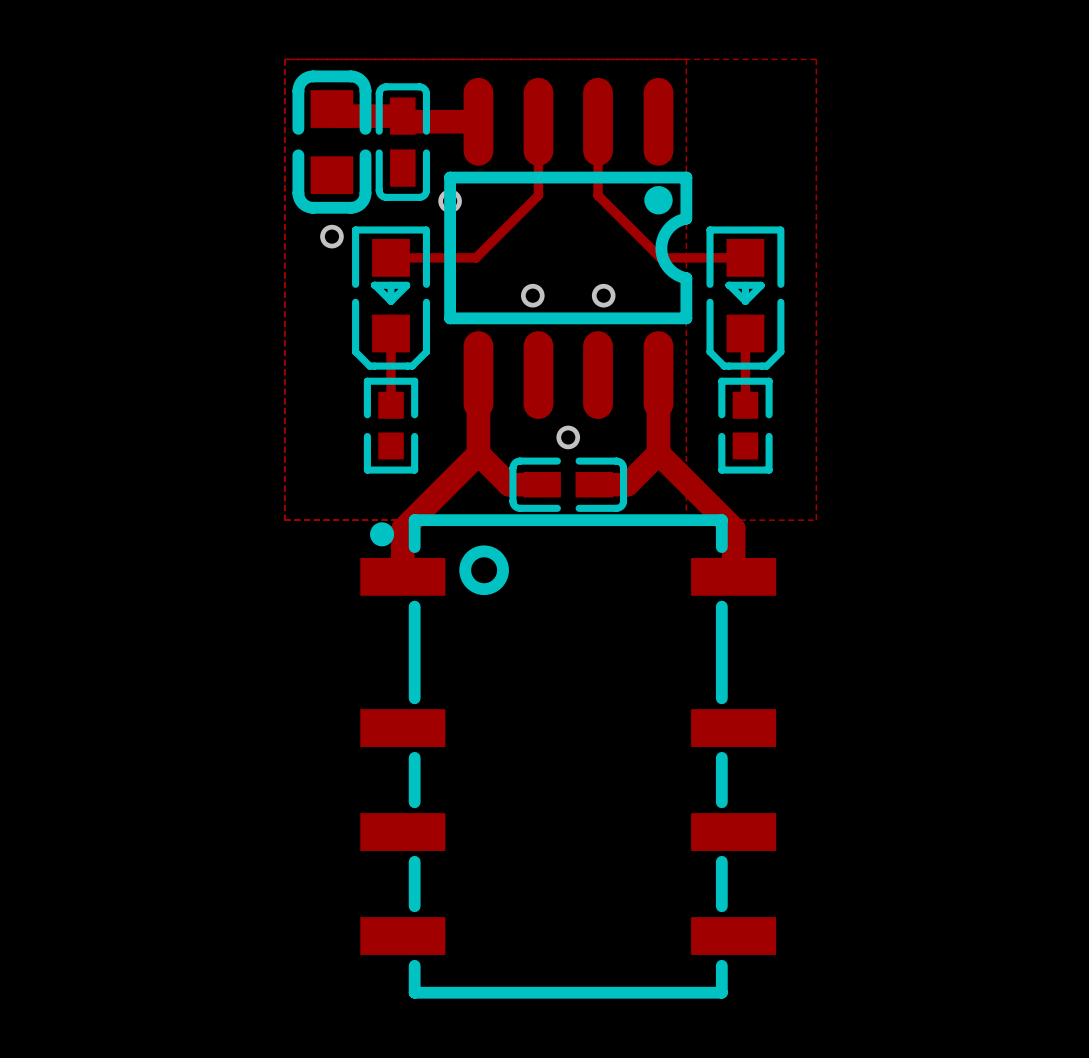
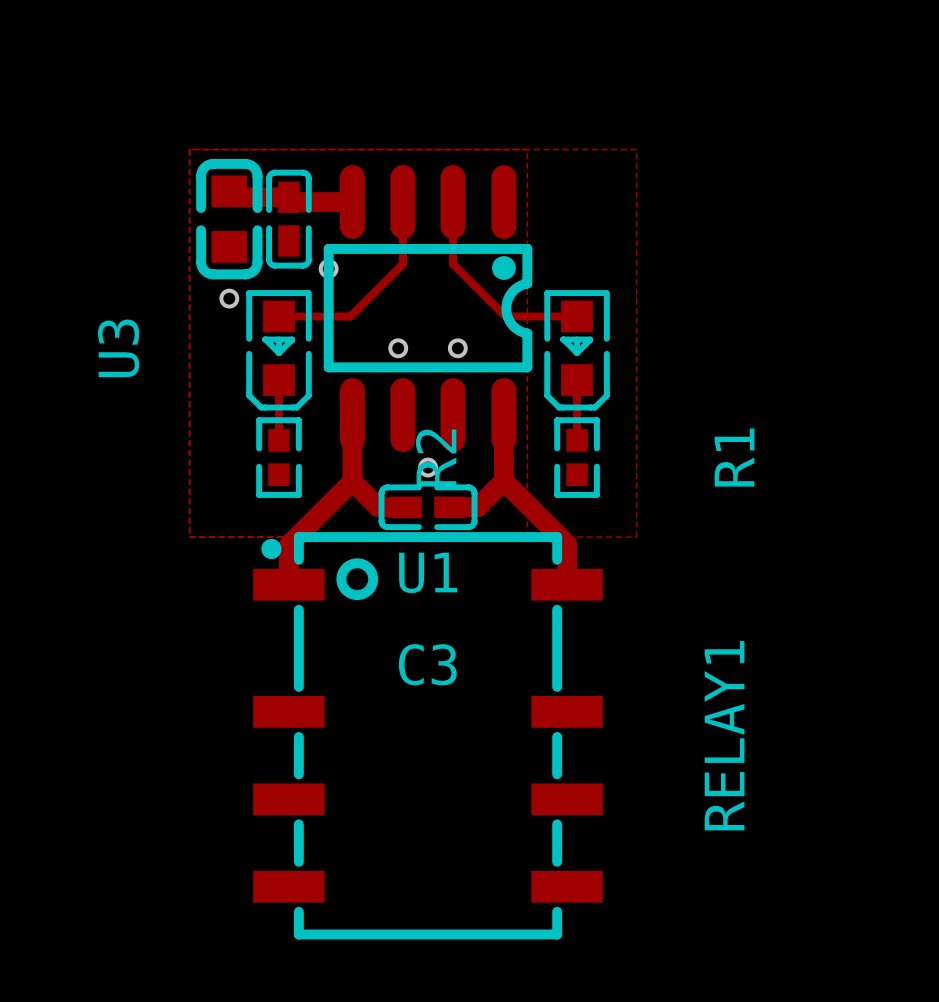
U3 name: none -> U3 (118, 348)
R1 name: none -> R1 (734, 457)
R2 name: none -> R2 (436, 457)
U1 name: none -> U1 (428, 572)
C3 name: none -> C3 (427, 664)
RELAY1 name: none -> RELAY1 (724, 735)

